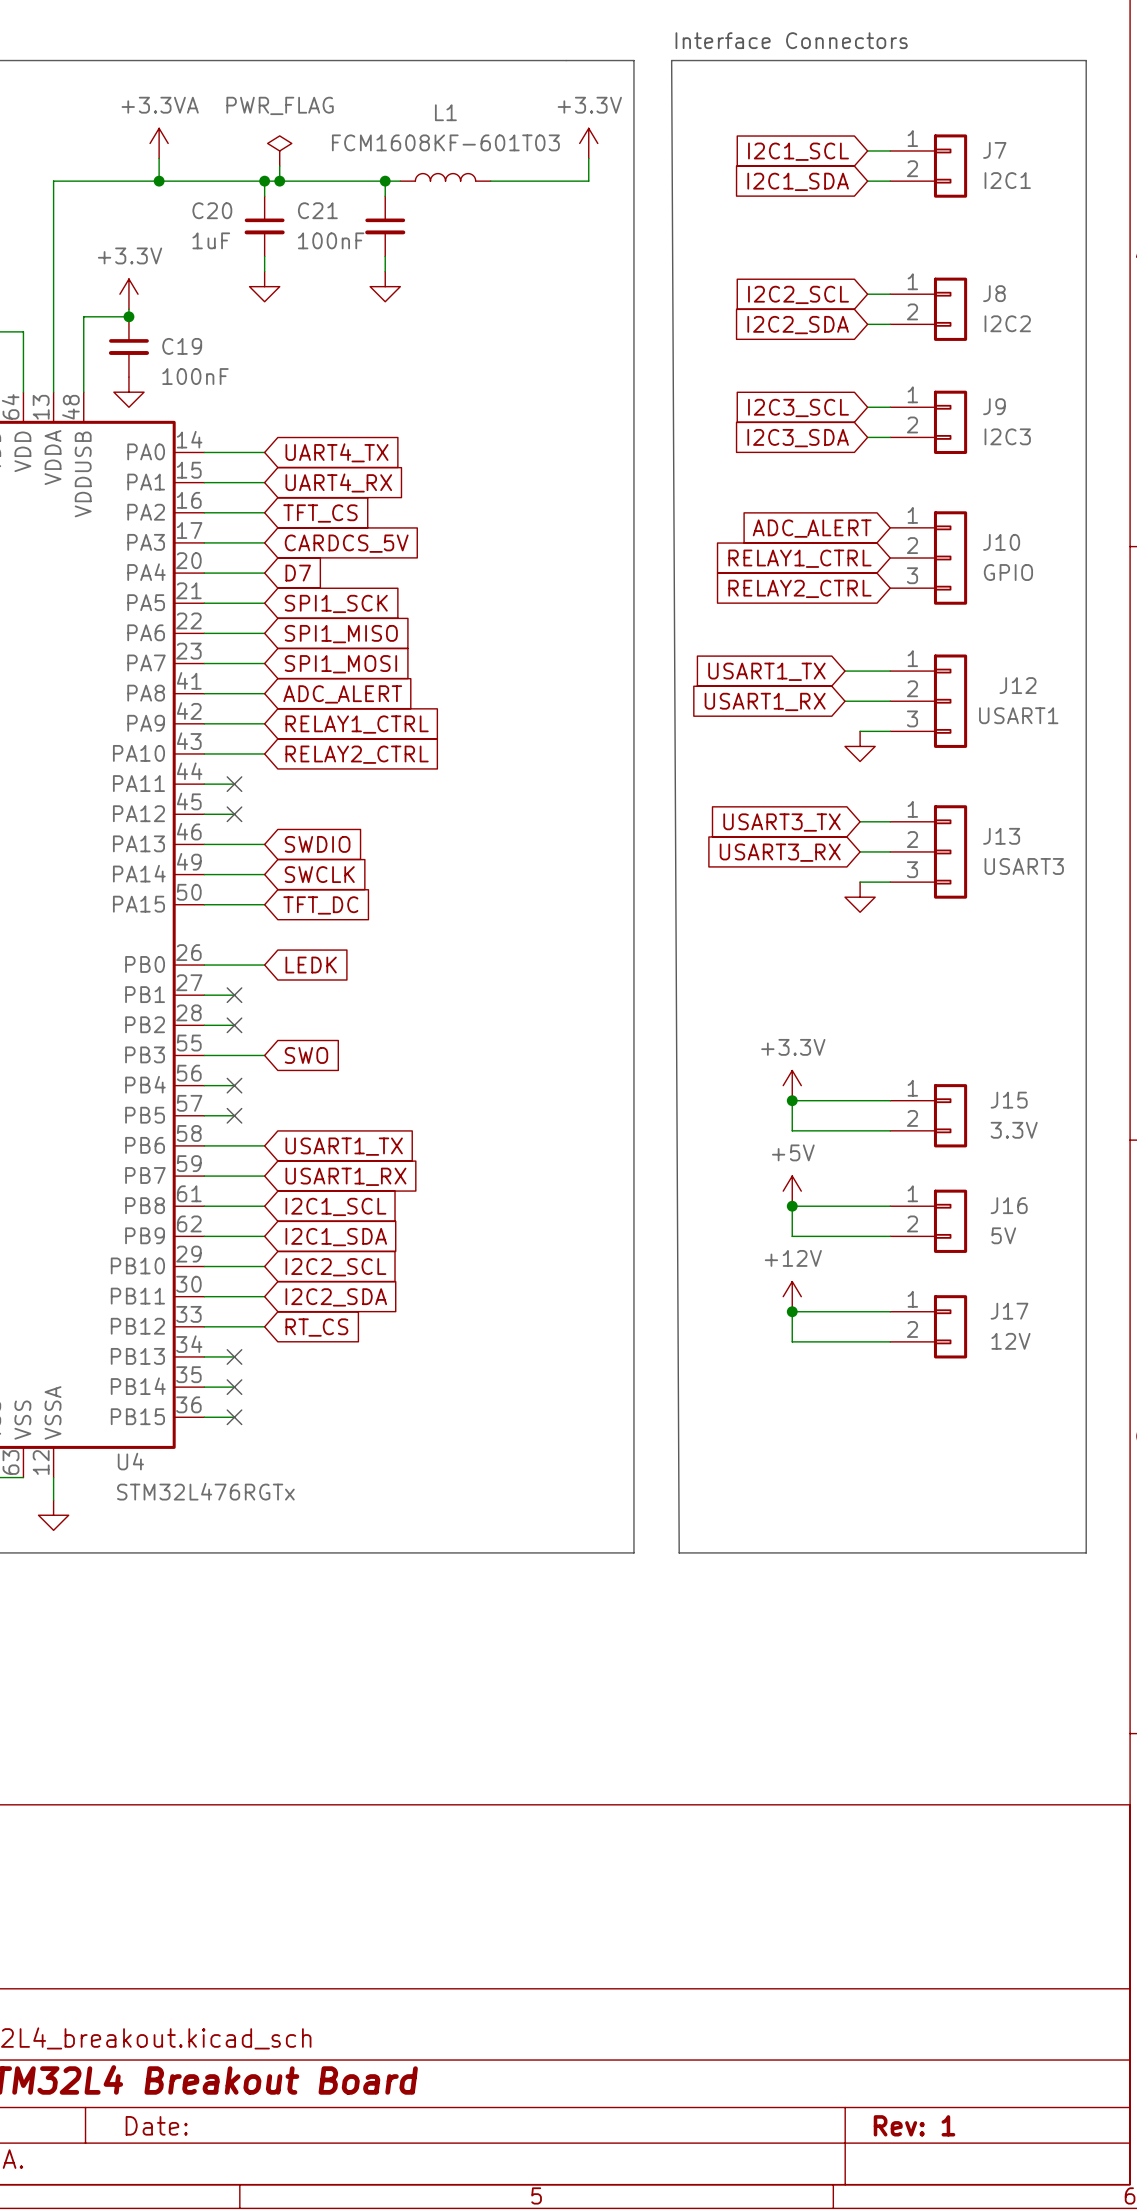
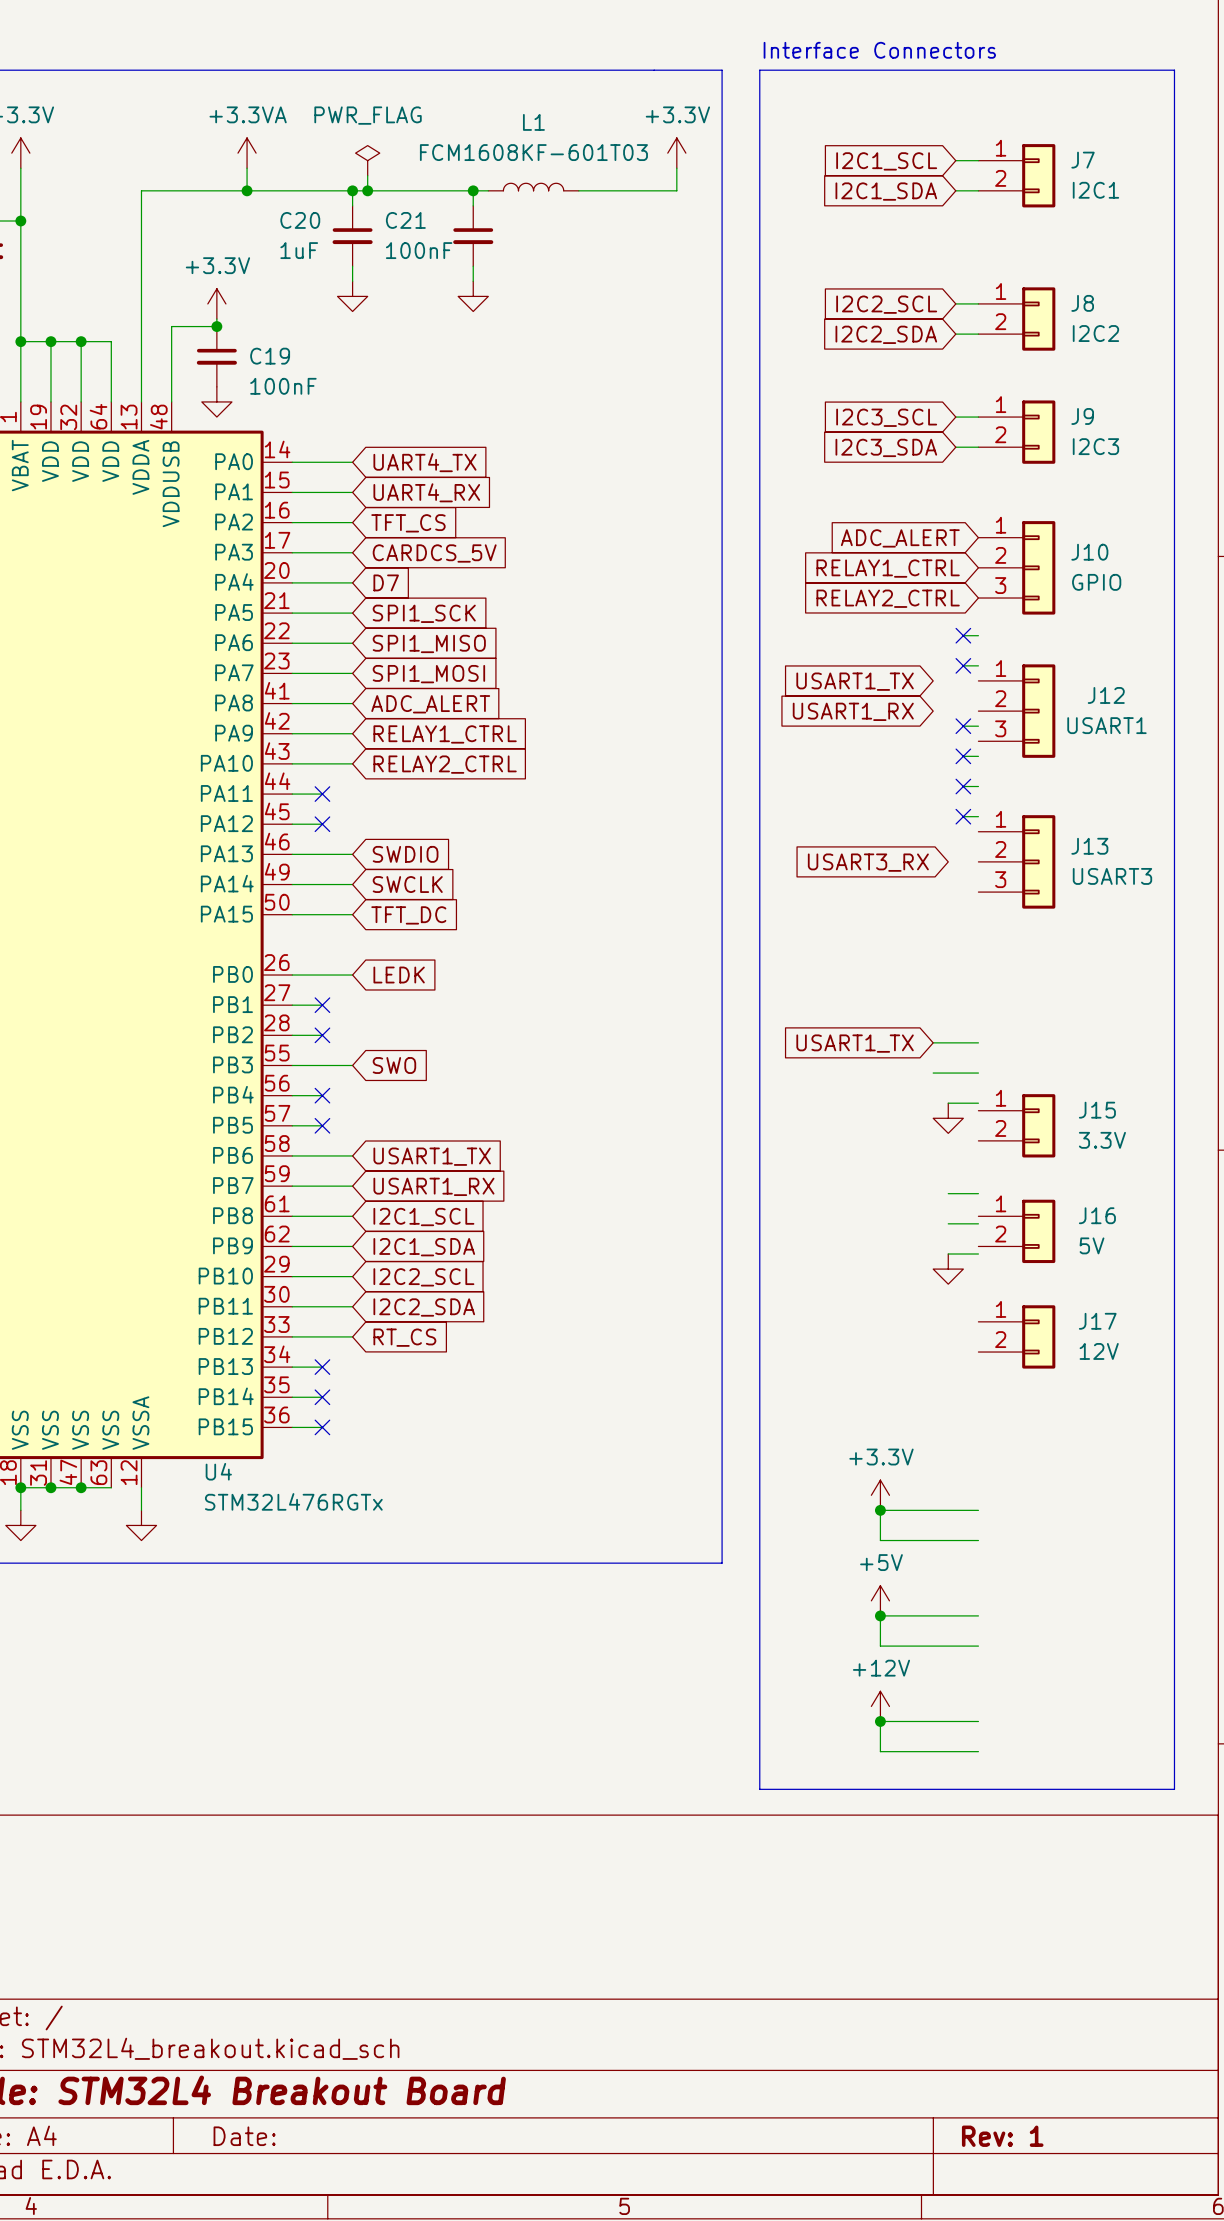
line: (671, 60) (679, 1552) (1086, 1552) -> (759, 70) (759, 1789) (1174, 1789) (1174, 1563)
wire: none -> (963, 635) (978, 635)
no-connect mark: none -> (963, 635)
wire: none -> (963, 665) (978, 665)
no-connect mark: none -> (963, 665)
wire: (845, 671) (890, 671) -> none
wire: (845, 701) (890, 701) -> none
wire: none -> (963, 726) (978, 726)
no-connect mark: none -> (963, 726)
wire: (860, 731) (890, 731) -> none
power symbol: (860, 746) -> none
wire: none -> (963, 756) (978, 756)
no-connect mark: none -> (963, 756)
wire: none -> (963, 786) (978, 786)
no-connect mark: none -> (963, 786)
wire: none -> (963, 816) (978, 816)
no-connect mark: none -> (963, 816)
wire: (860, 821) (890, 821) -> none
global label: USART3_TX (782, 822) -> none
wire: (860, 851) (890, 851) -> none
wire: (860, 882) (890, 882) -> (948, 1103) (978, 1103)
power symbol: (860, 897) -> none
wire: none -> (933, 1042) (978, 1042)
global label: none -> USART1_TX (855, 1043)
wire: none -> (933, 1073) (978, 1073)
power symbol: +3.3V (792, 1085) -> none
junction: (792, 1100) -> none
wire: (890, 1100) (792, 1100) (792, 1130) (890, 1130) -> none
power symbol: none -> (948, 1118)
wire: none -> (948, 1193) (978, 1193)
power symbol: +5V (792, 1191) -> none
junction: (792, 1206) -> none
wire: (890, 1206) (792, 1206) (792, 1236) (890, 1236) -> (978, 1510) (880, 1510) (880, 1540) (978, 1540)
wire: none -> (948, 1223) (978, 1223)
wire: none -> (948, 1254) (978, 1254)
power symbol: none -> (948, 1269)
power symbol: +12V (792, 1296) -> none
junction: (792, 1311) -> none
wire: (890, 1311) (792, 1311) (792, 1341) (890, 1341) -> (978, 1615) (880, 1615) (880, 1646) (978, 1646)
power symbol: none -> +3.3V (880, 1495)
junction: none -> (880, 1510)
power symbol: none -> +5V (880, 1600)
junction: none -> (880, 1615)
power symbol: none -> +12V (880, 1706)
junction: none -> (880, 1721)
wire: none -> (978, 1721) (880, 1721) (880, 1751) (978, 1751)

